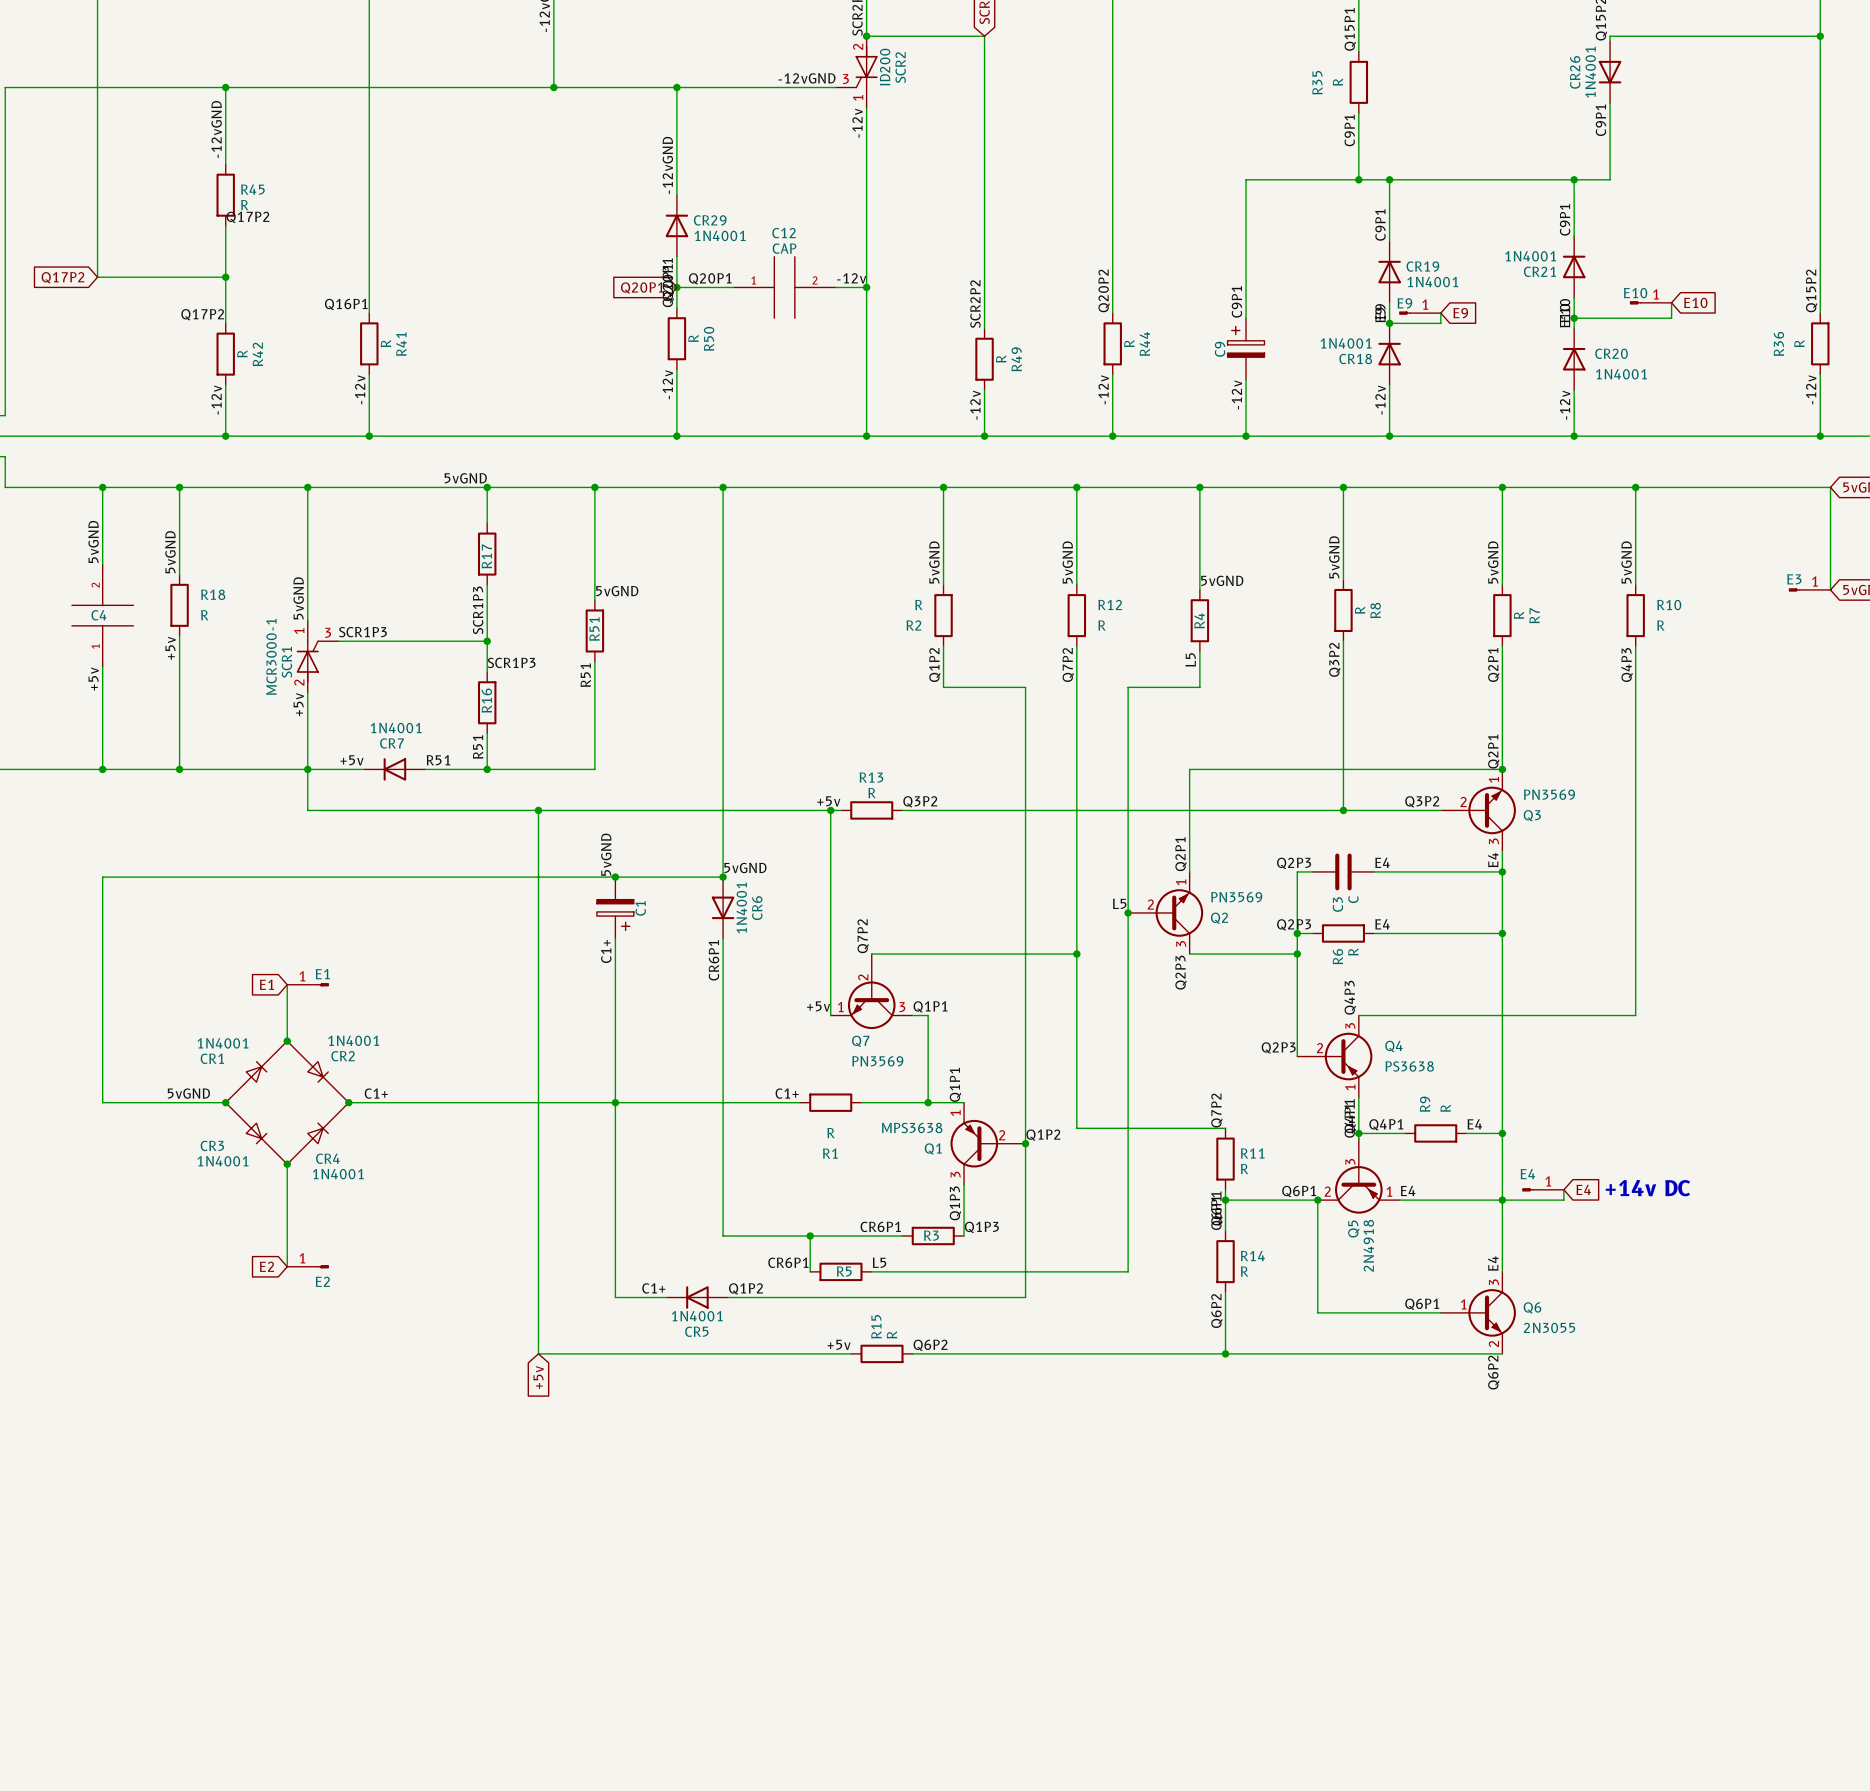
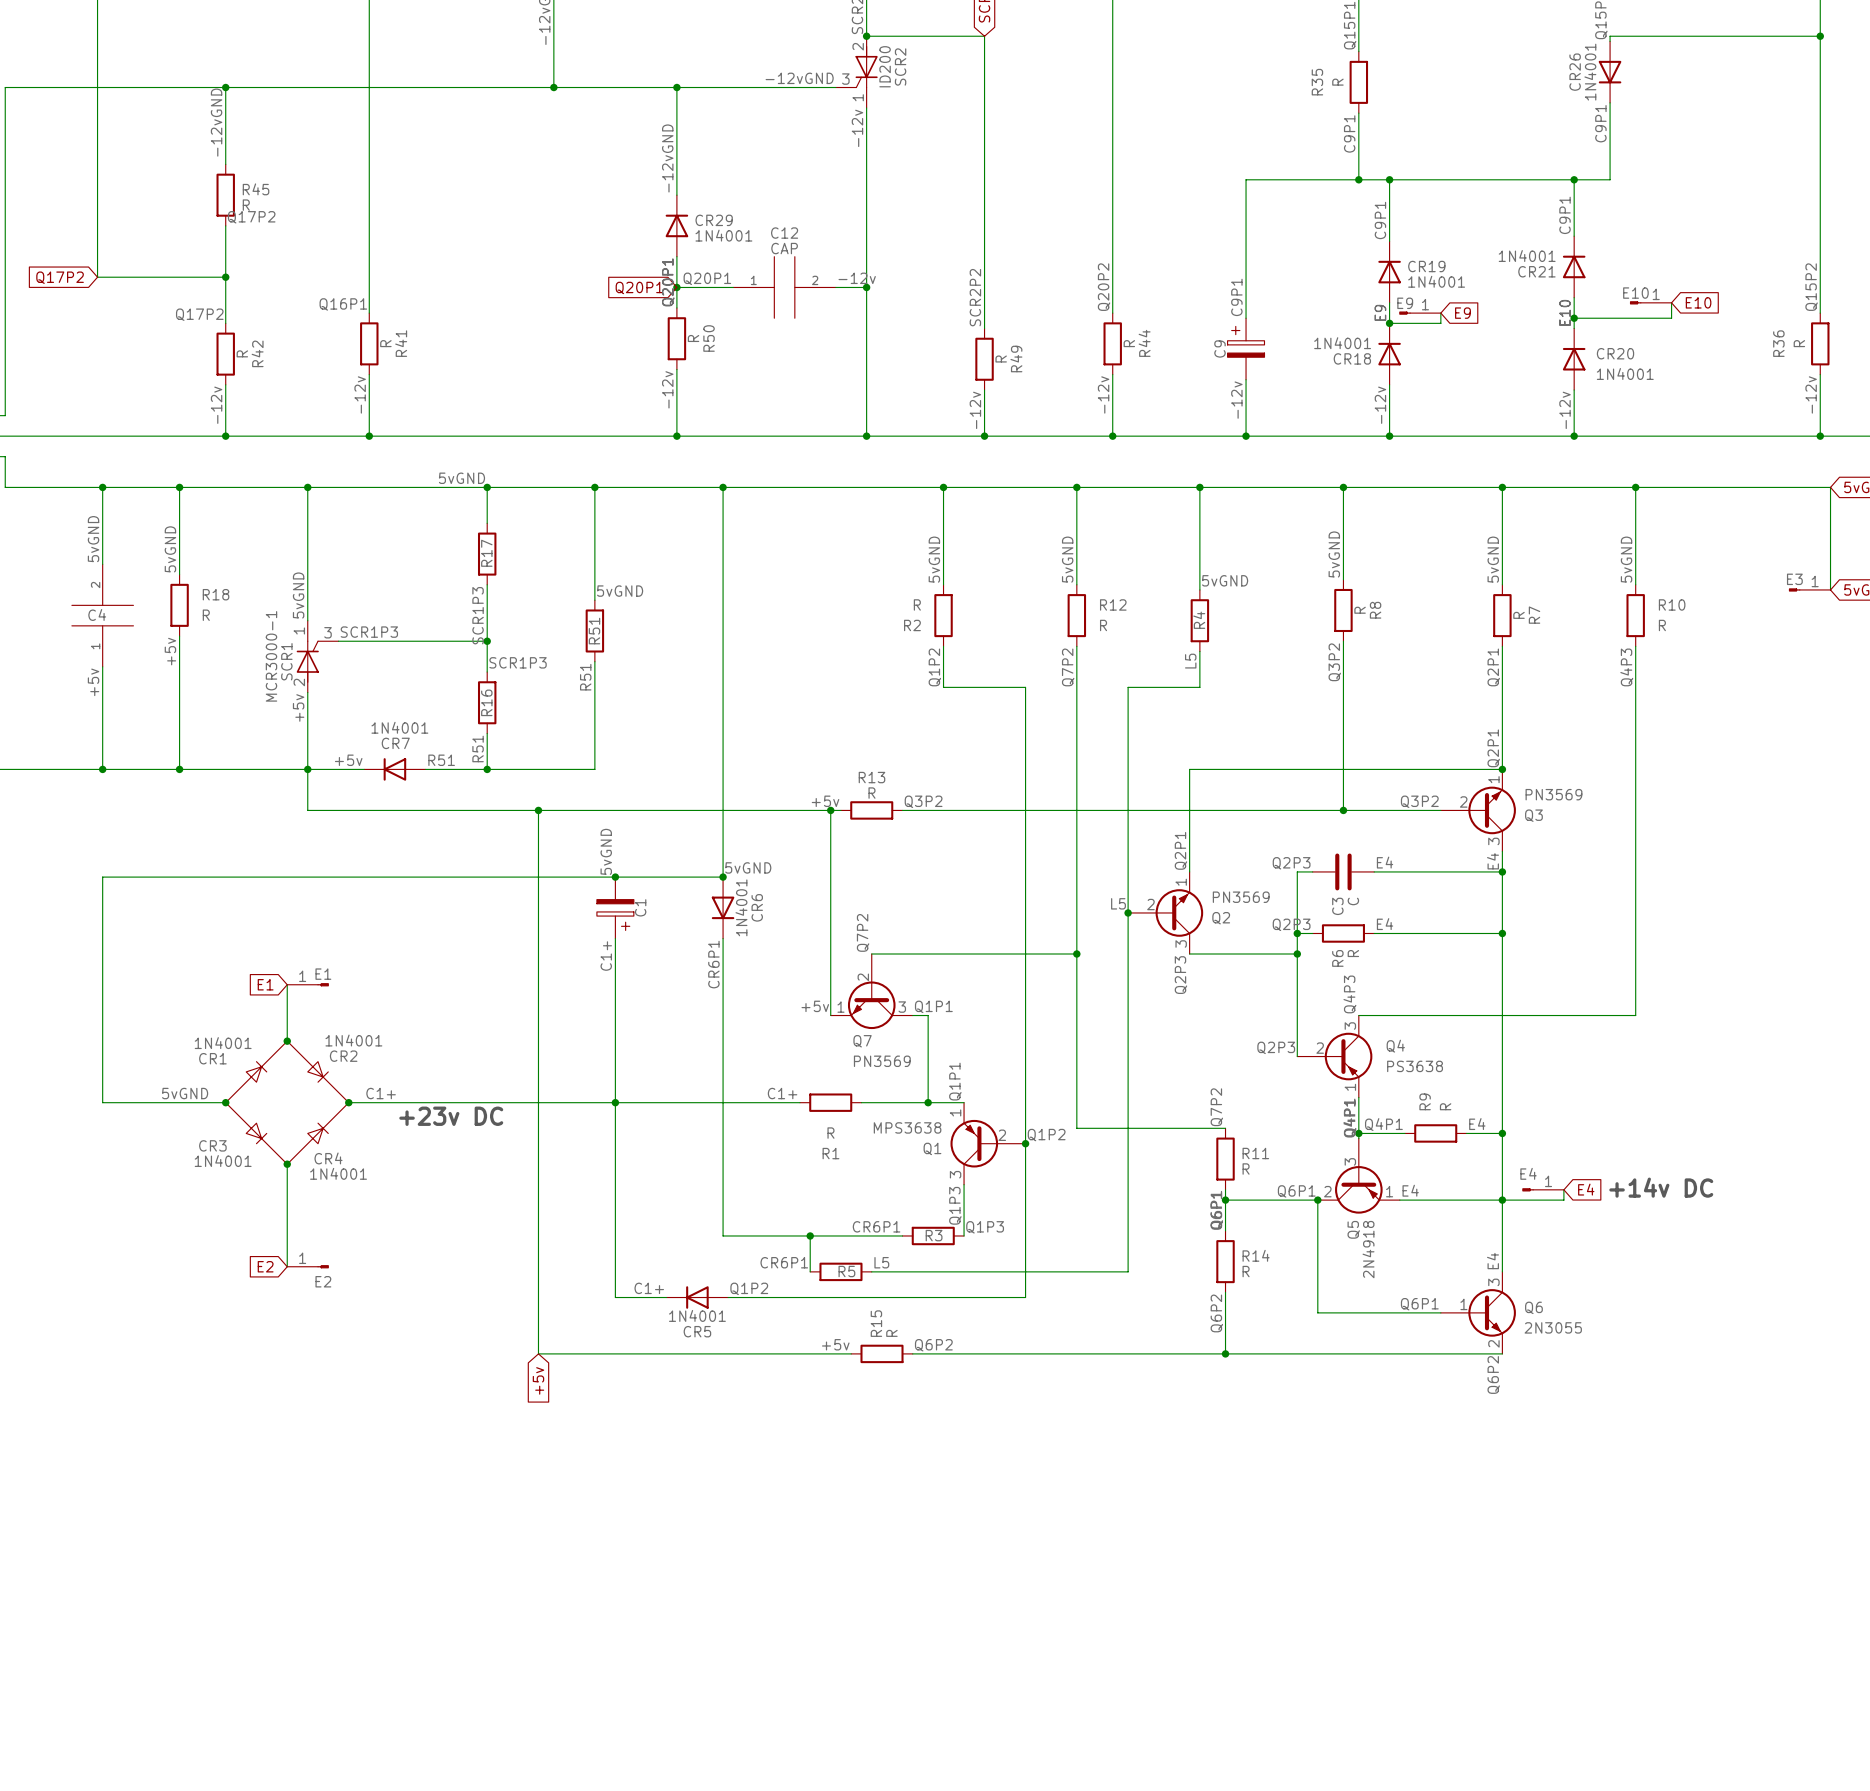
text: none -> +23v DC (451, 1116)

